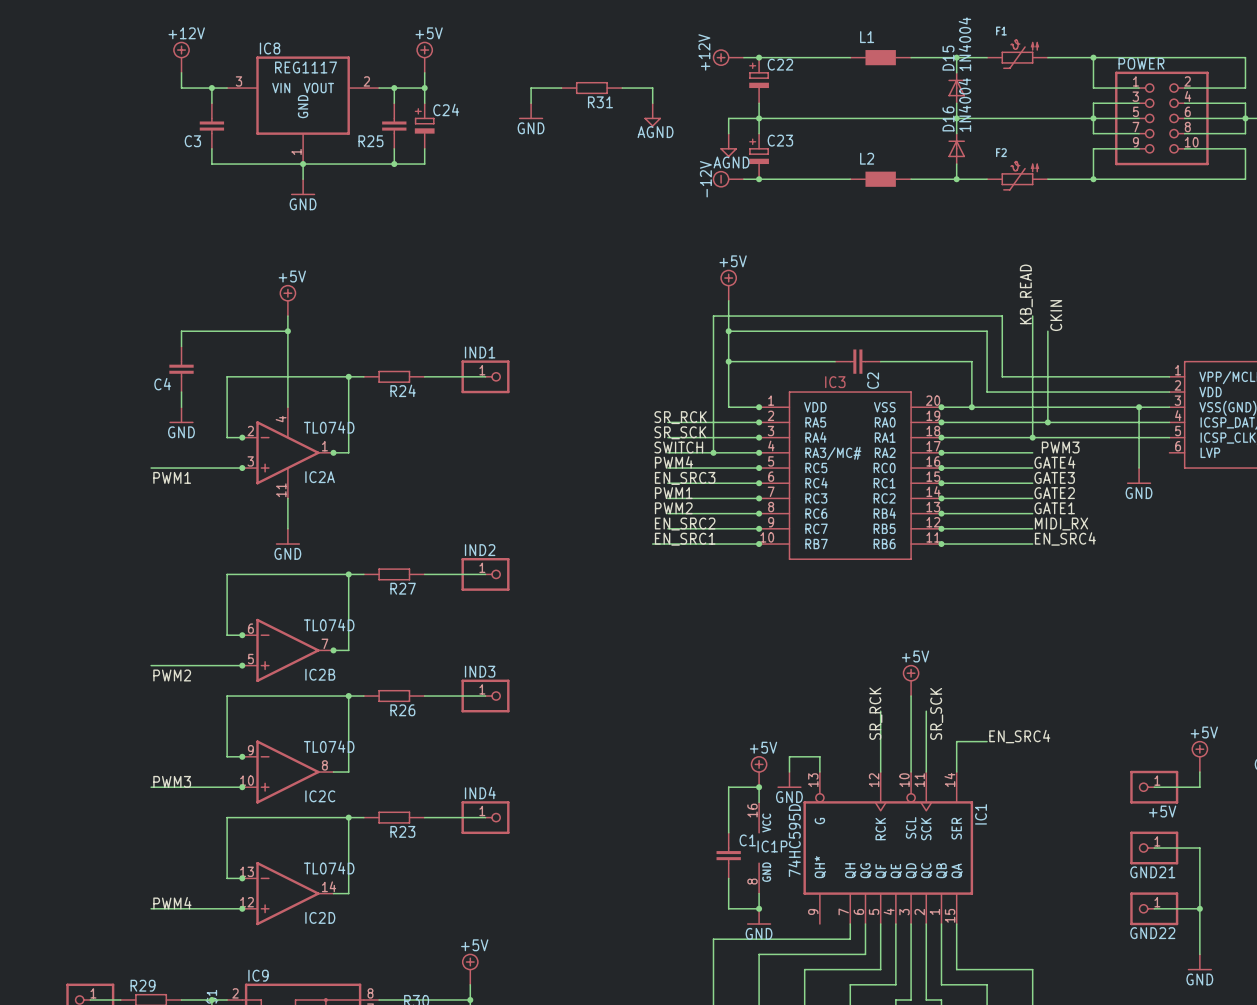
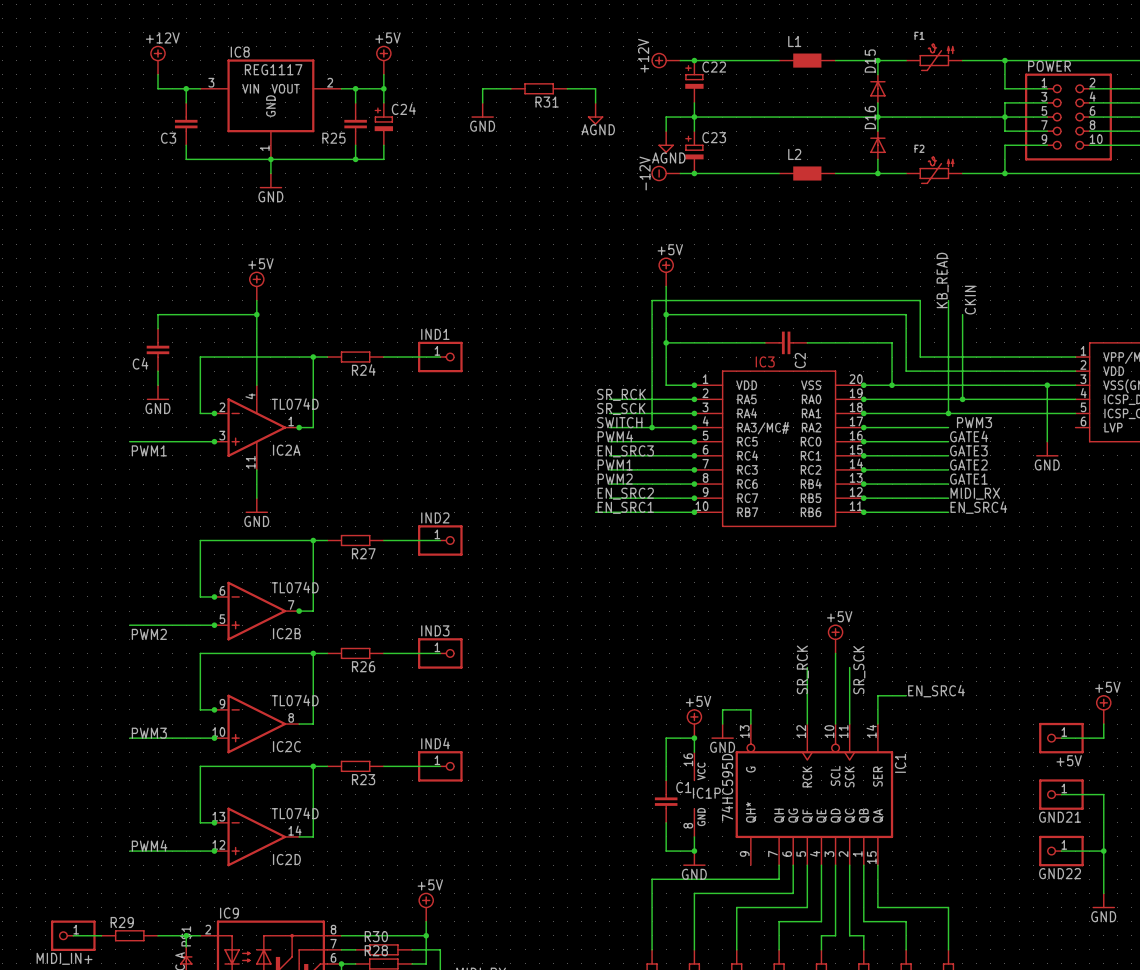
D15 value: 1N4004 (964, 44) -> none
D16 value: 1N4004 (964, 105) -> none

